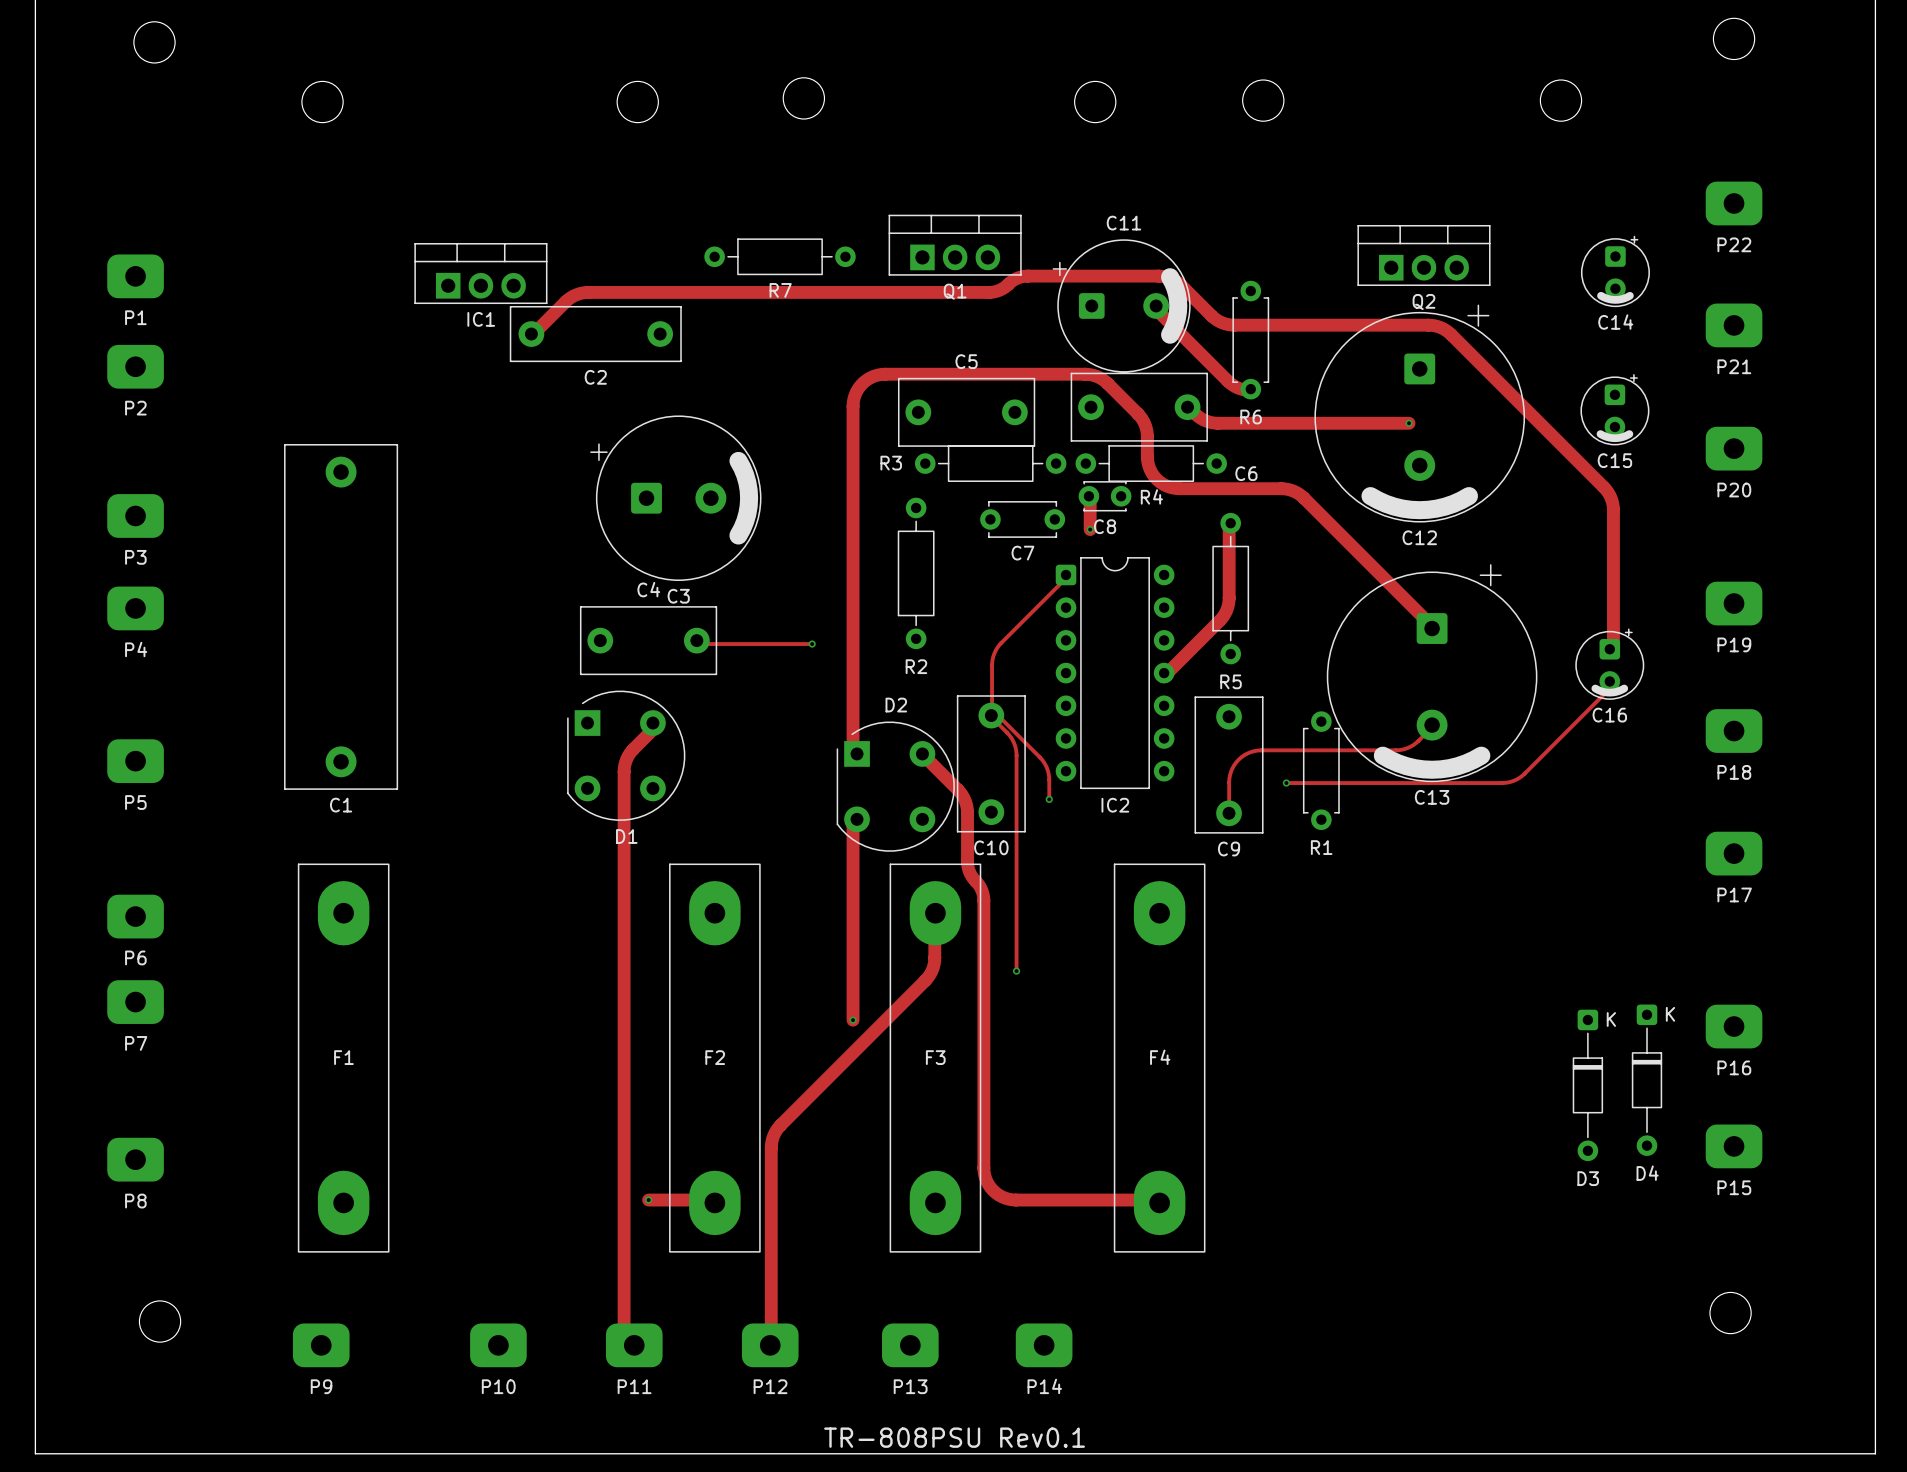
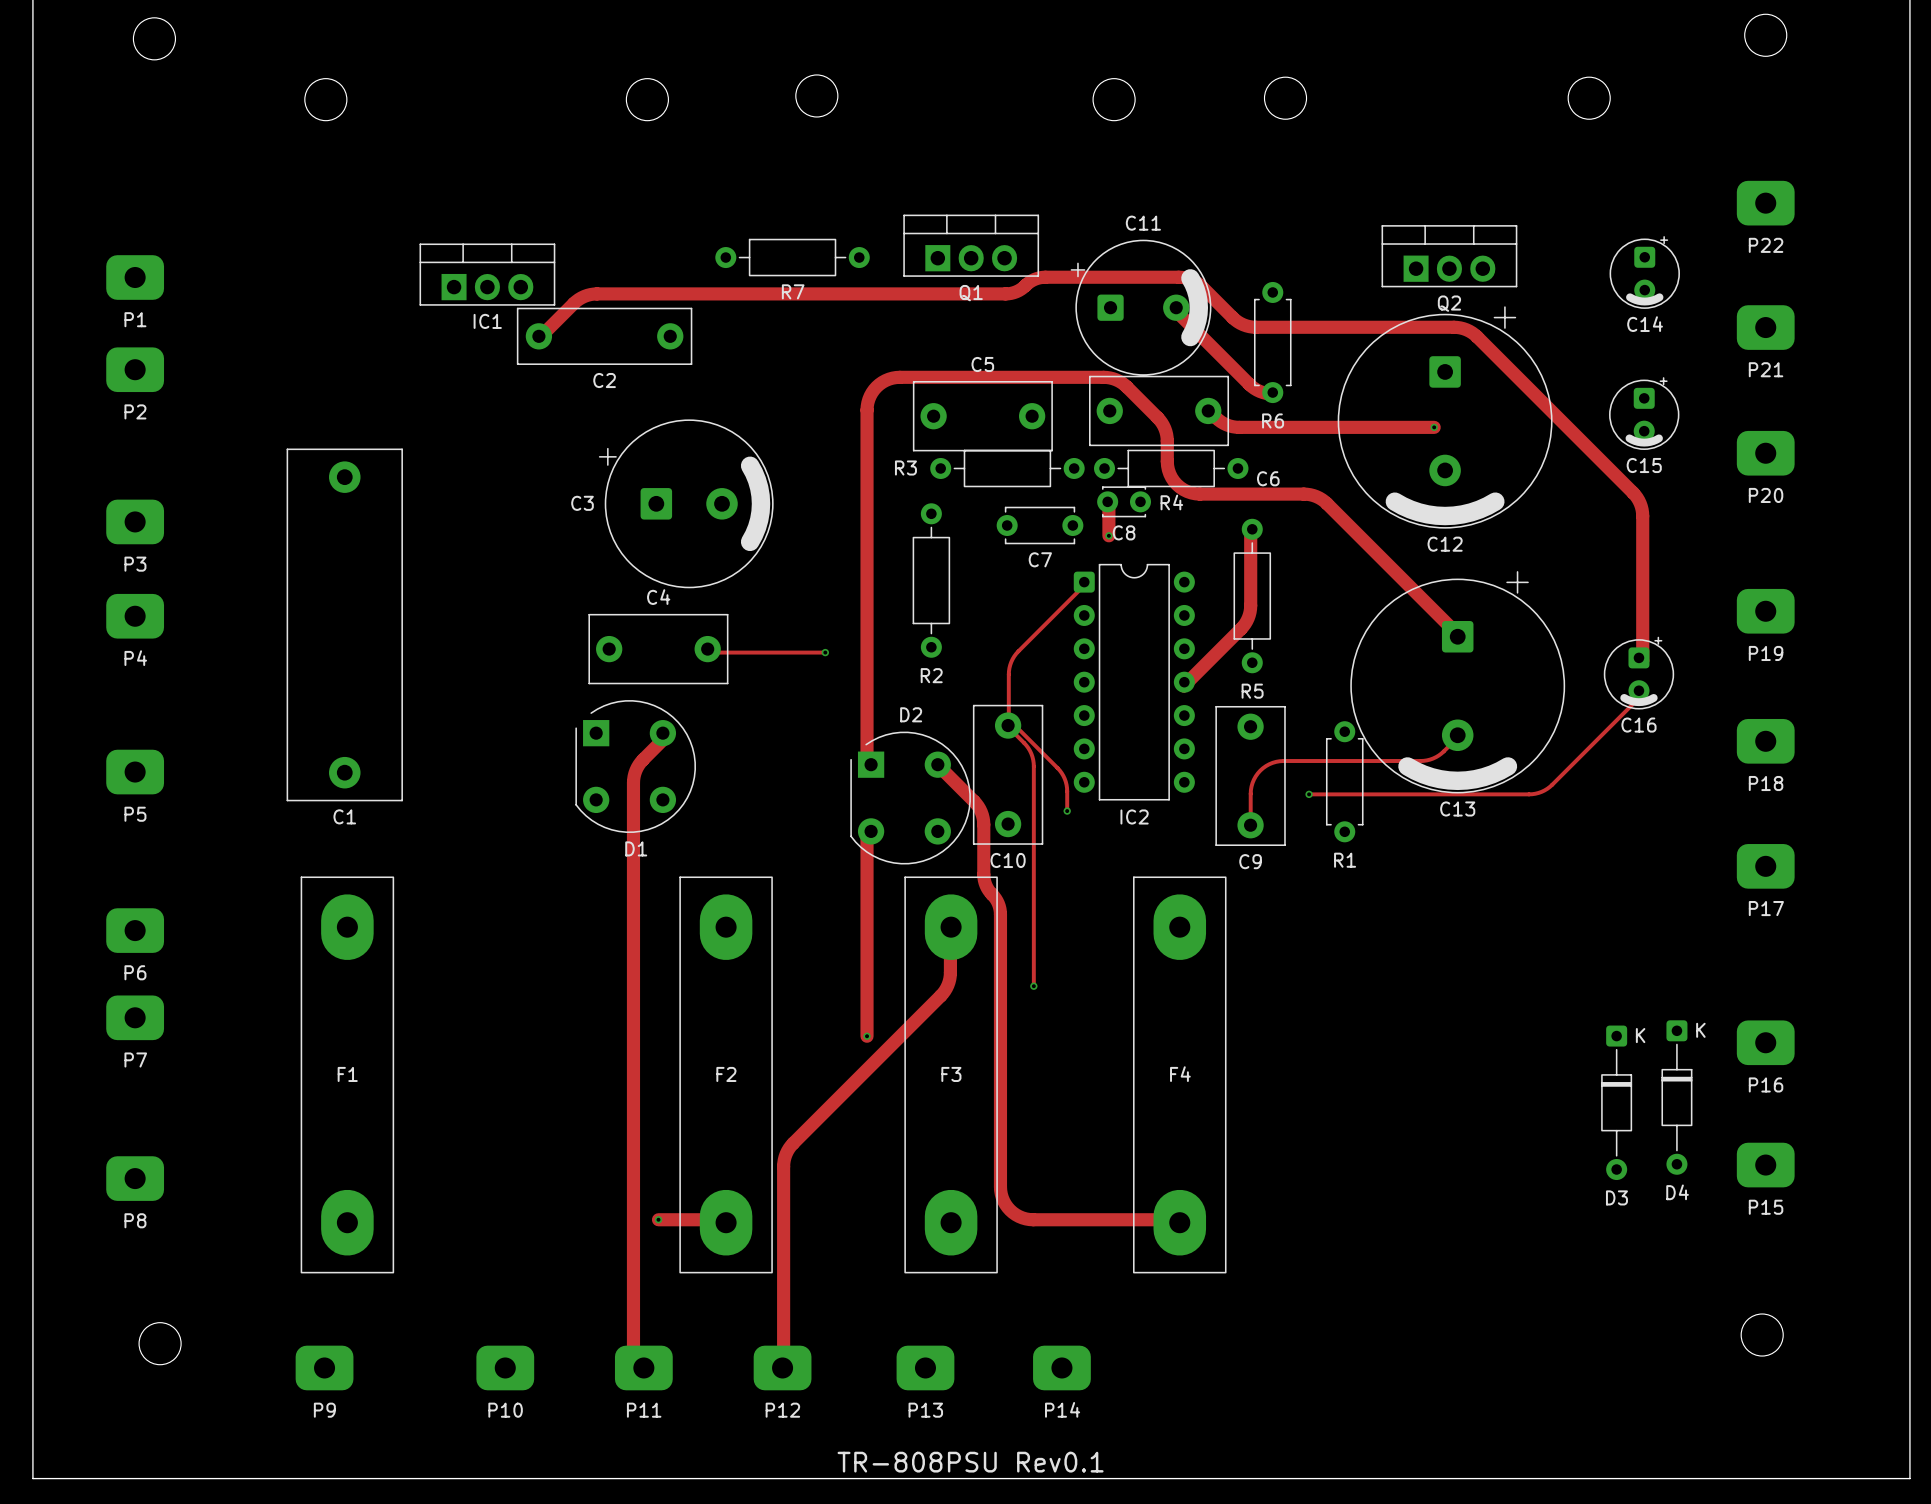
C3 name position: C3 (678, 596) -> C3 (582, 503)

